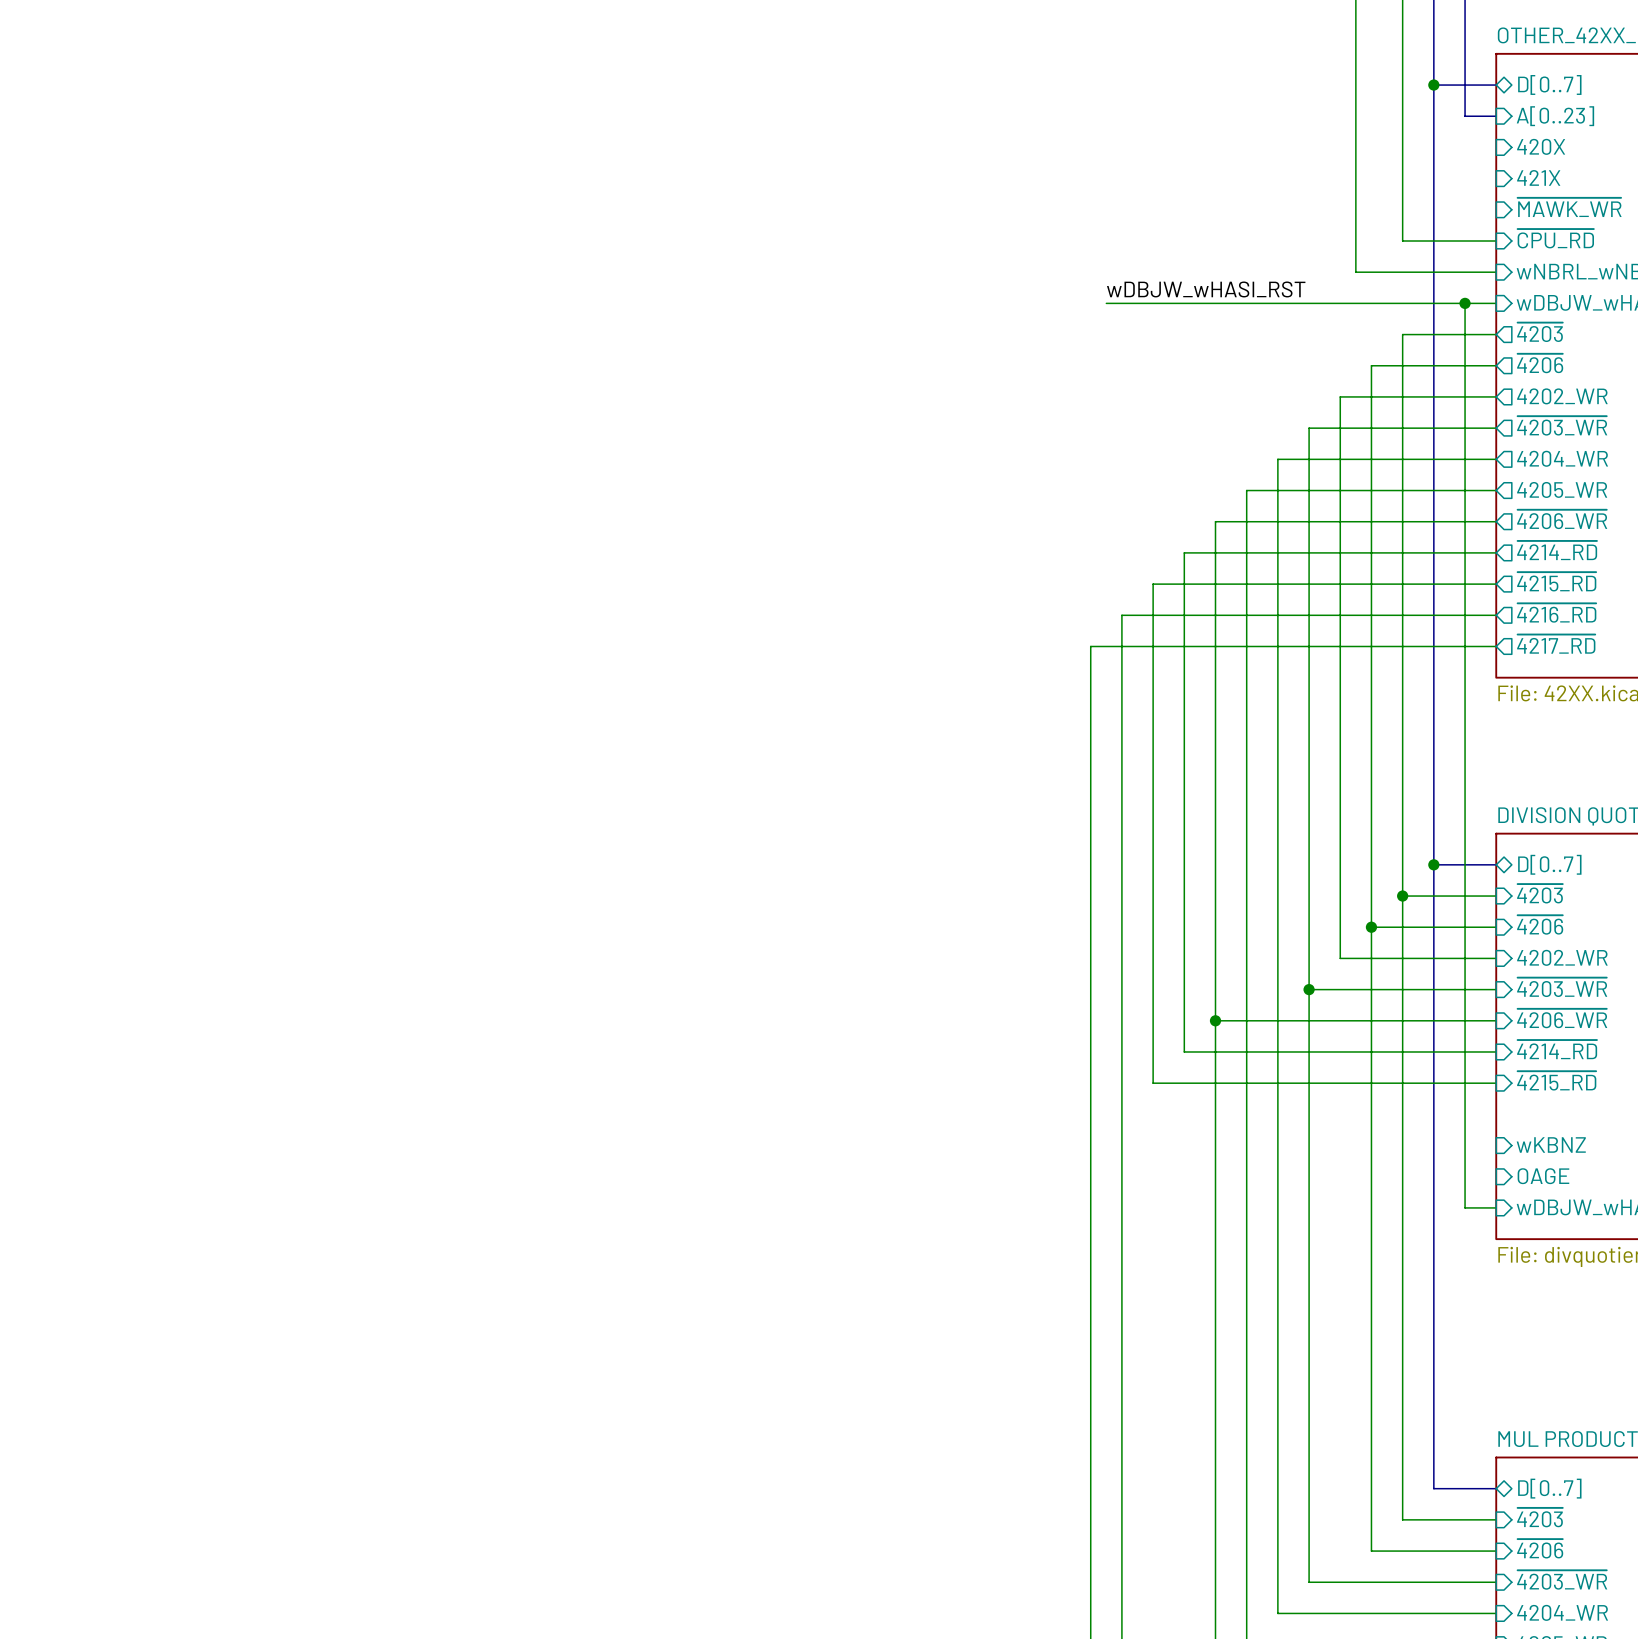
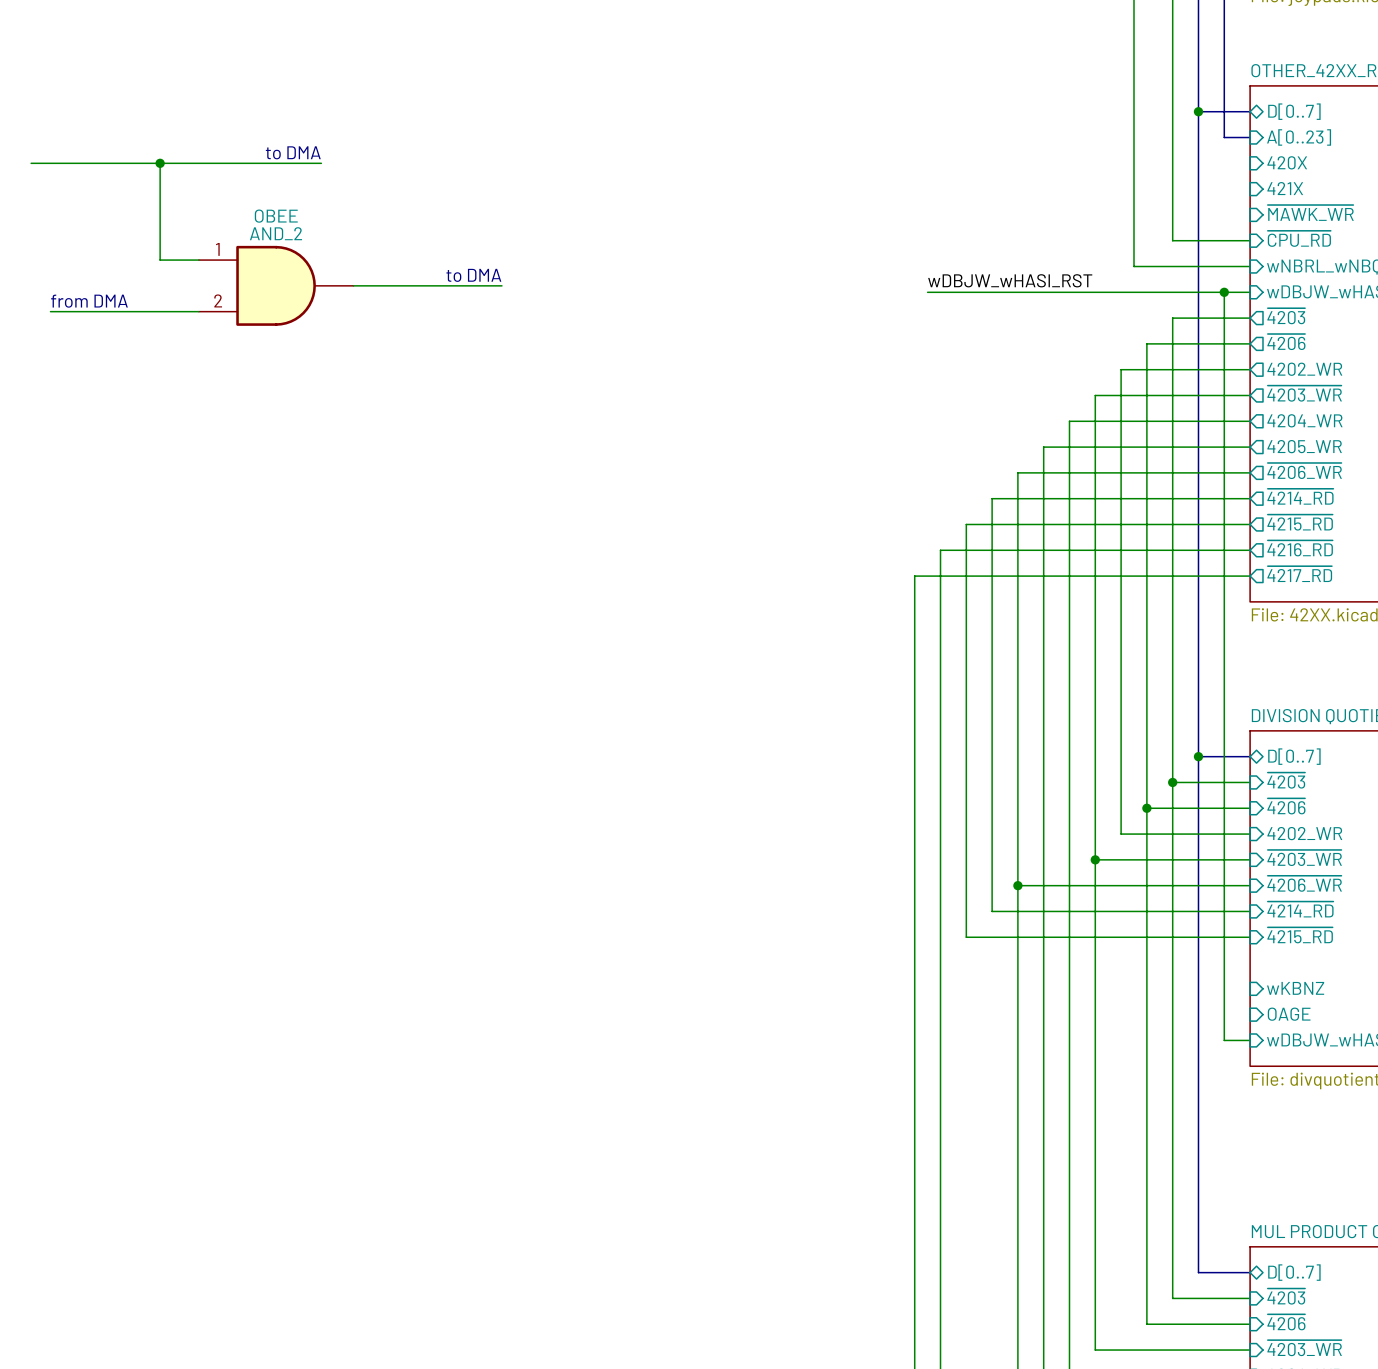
text: none -> to DMA (293, 152)
wire: none -> (31, 163) (321, 163)
wire: none -> (160, 163) (160, 260) (198, 260)
junction: none -> (160, 163)
text: none -> to DMA (473, 275)
OBEE: none -> AND_2 (276, 285)
wire: none -> (353, 285) (501, 285)
text: none -> from DMA (89, 301)
wire: none -> (50, 311) (198, 311)

